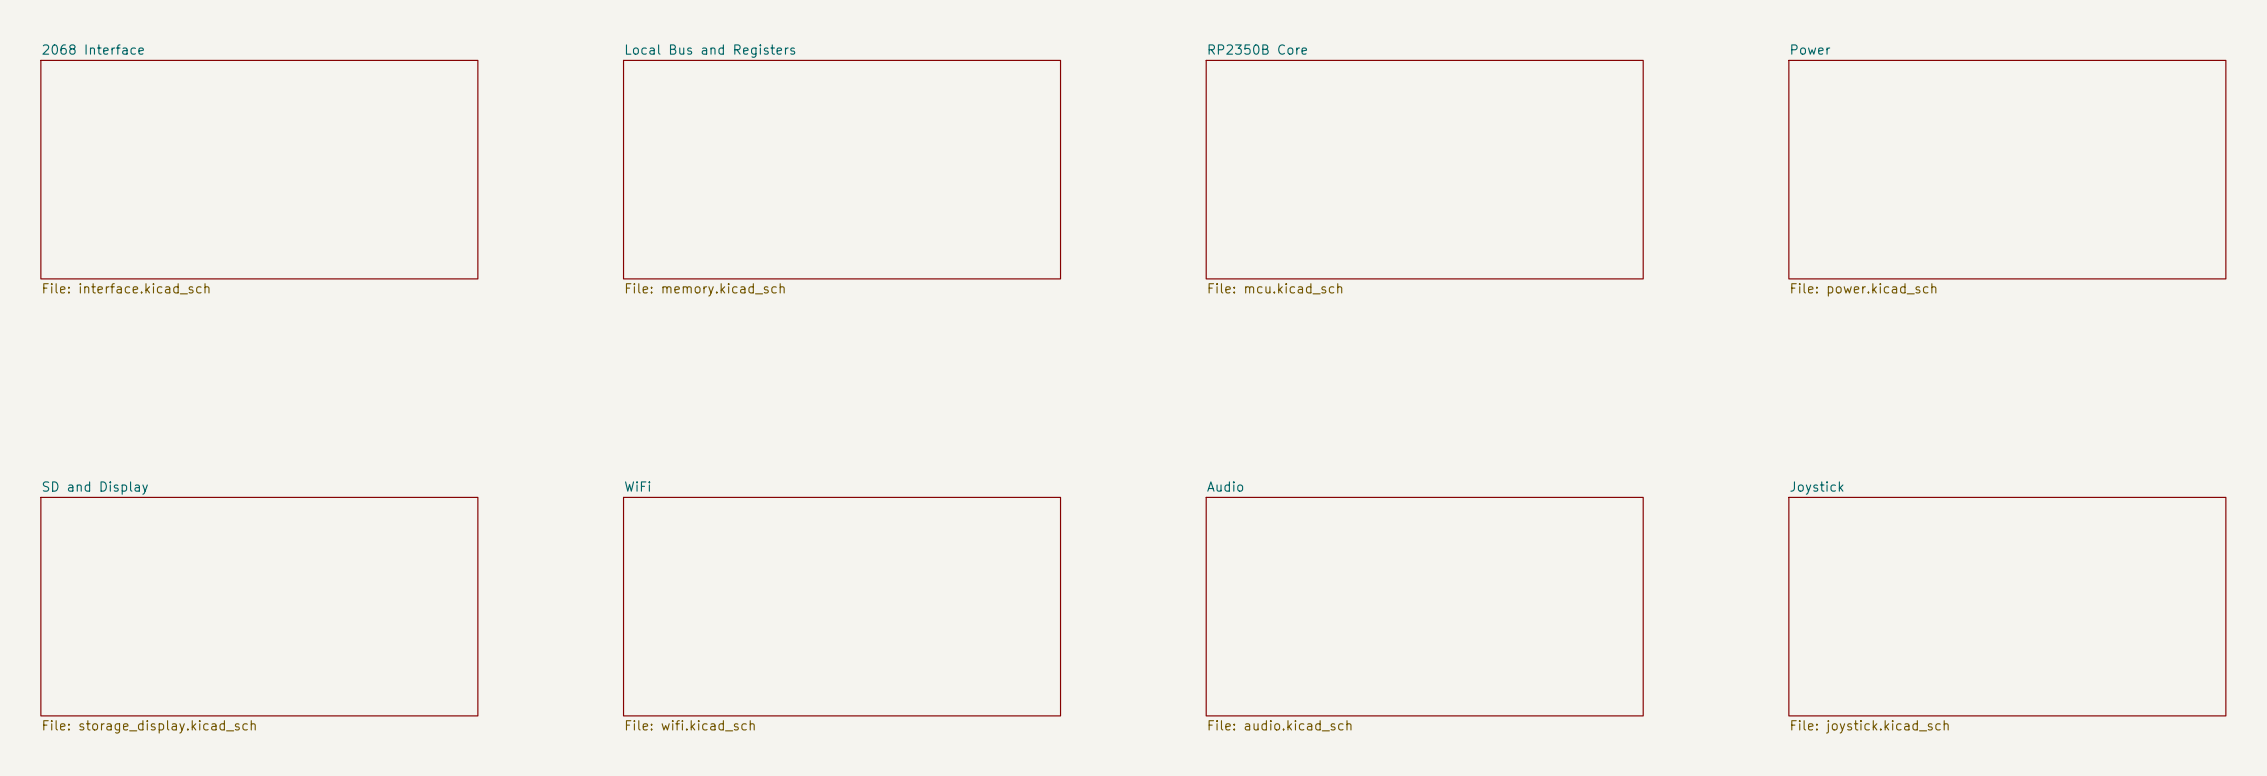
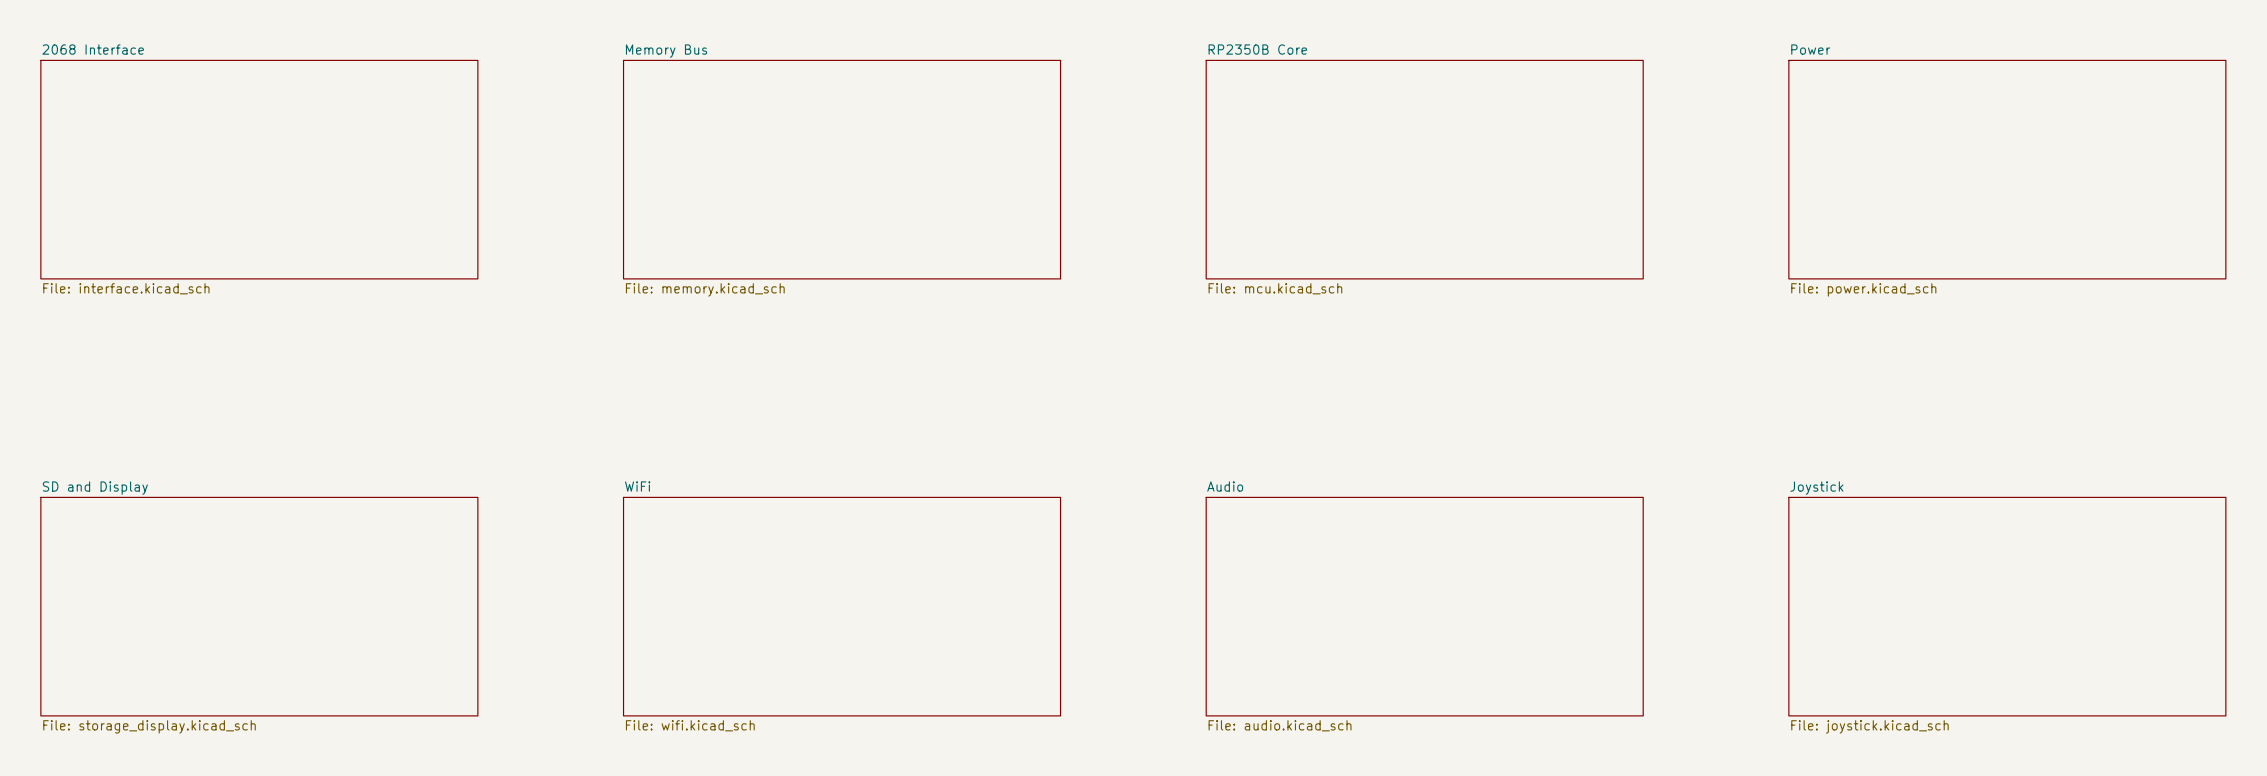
sheet Local Bus and Registers name: Local Bus and Registers (710, 51) -> Memory Bus (666, 51)

